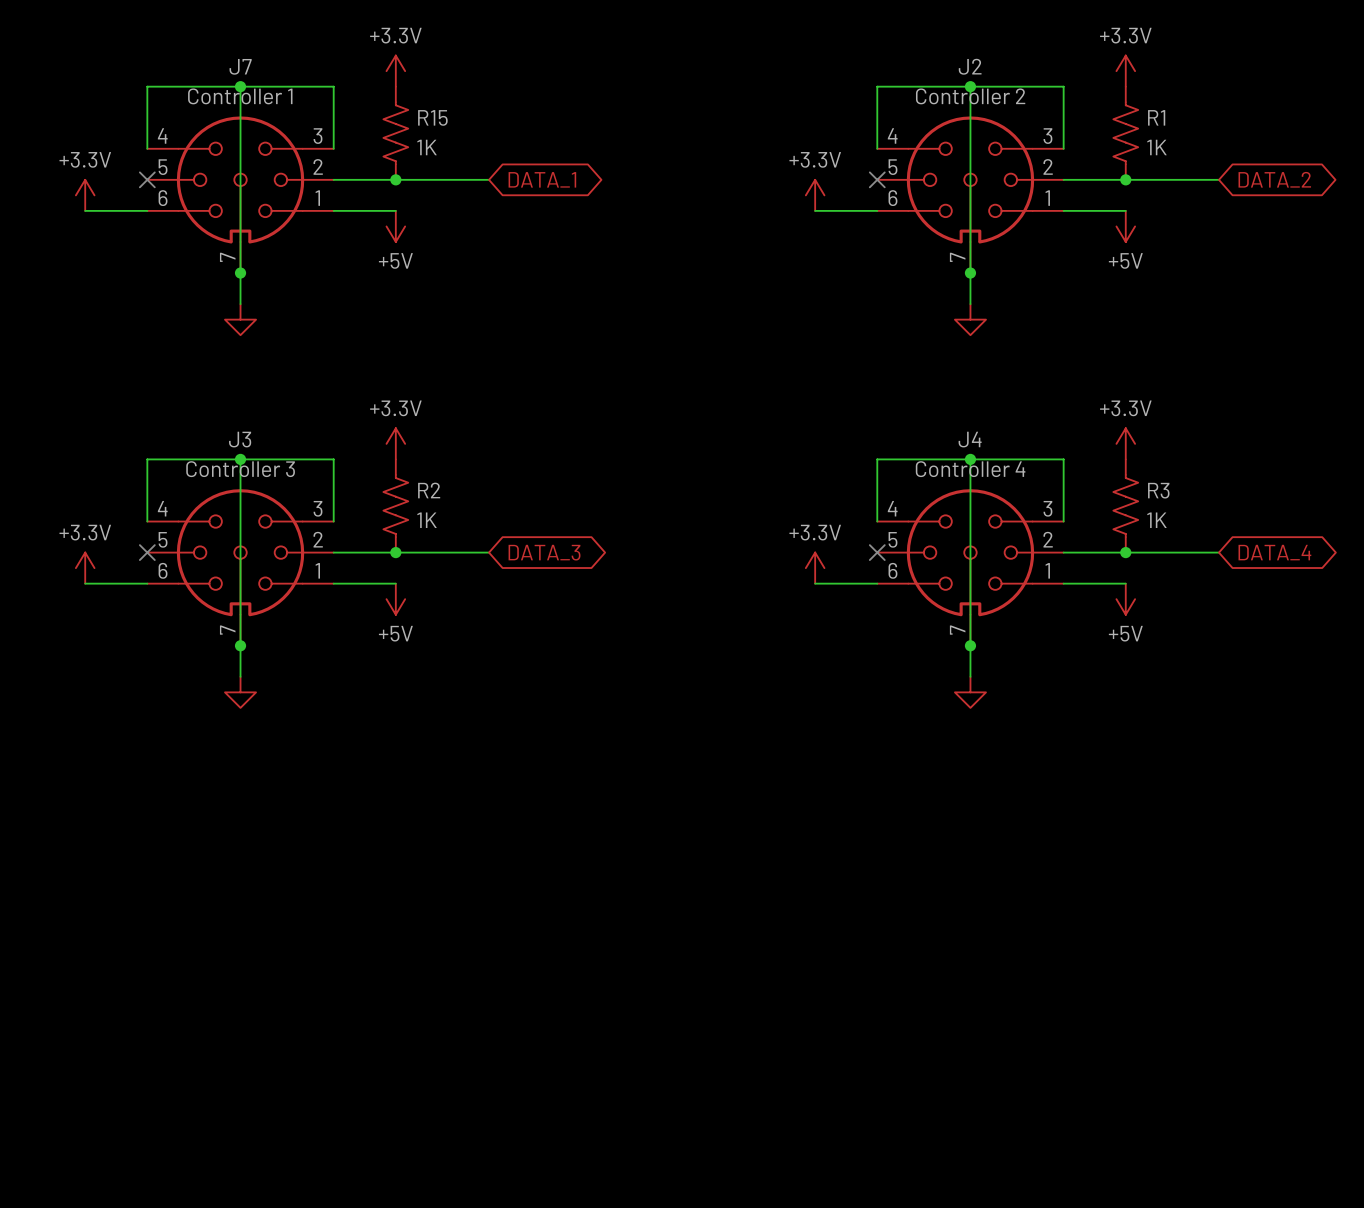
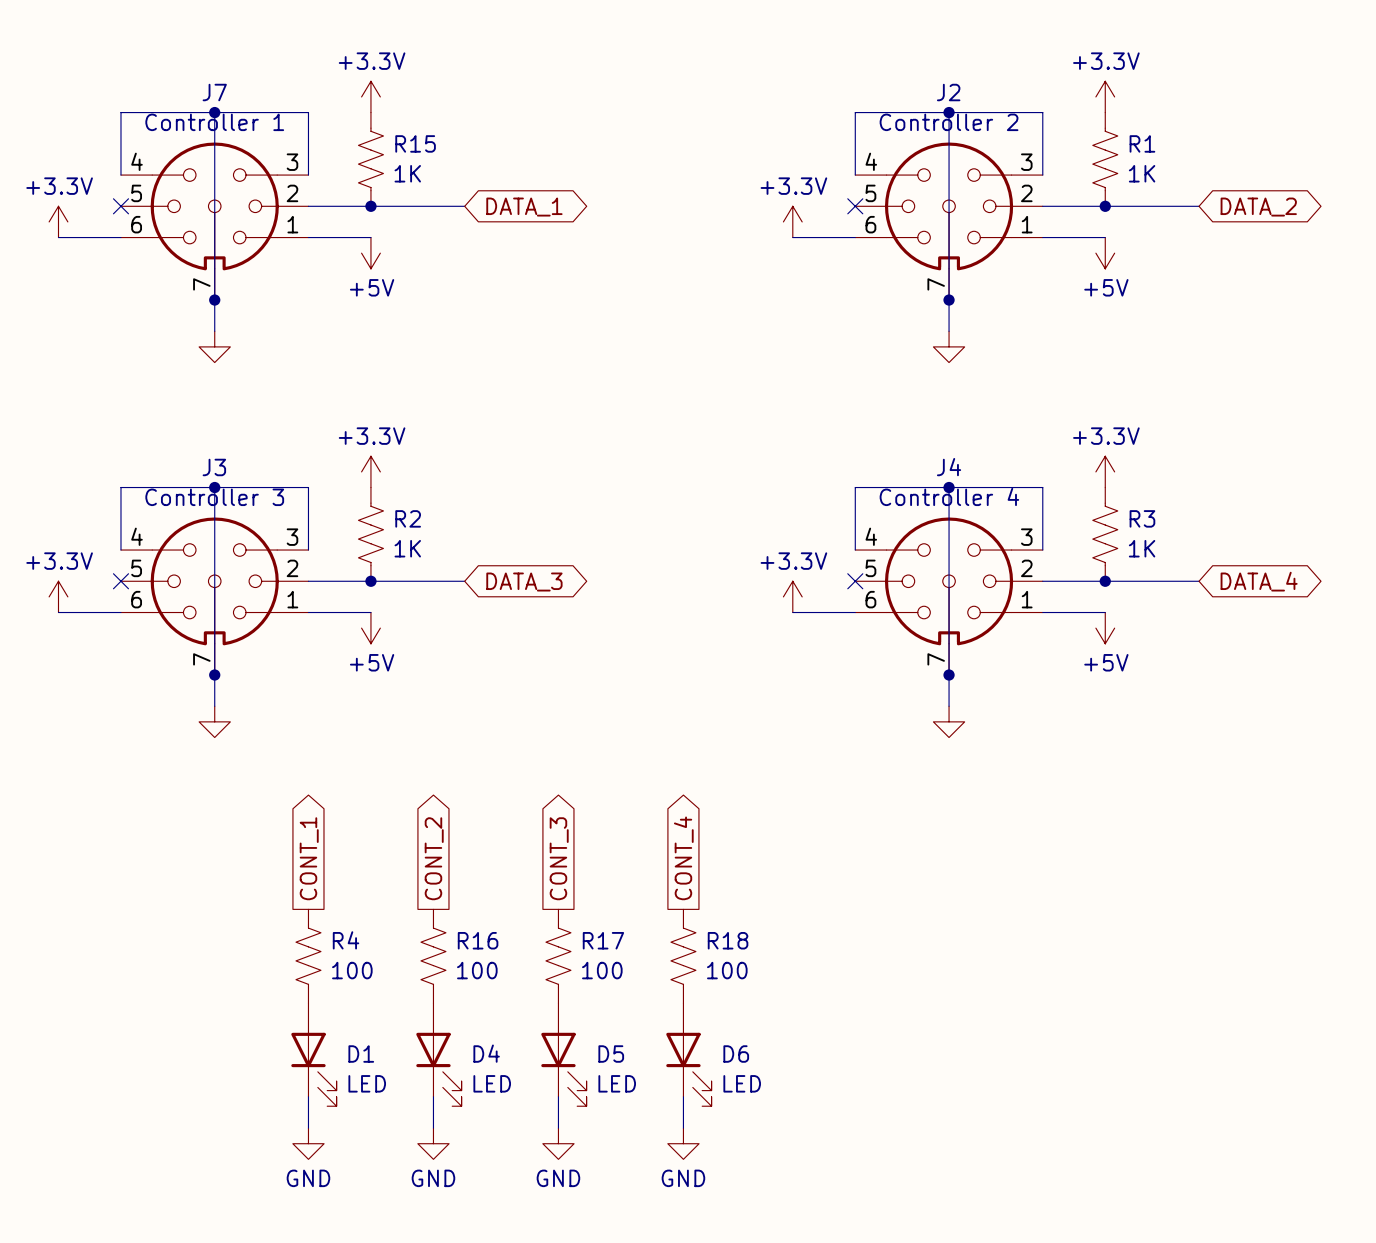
global label: none -> CONT_2 (434, 858)
global label: none -> CONT_4 (683, 858)
global label: none -> CONT_3 (559, 858)
global label: none -> CONT_1 (309, 858)
R4: none -> 100 (308, 956)
R16: none -> 100 (433, 956)
R17: none -> 100 (558, 956)
R18: none -> 100 (683, 956)
D1: none -> LED (313, 1054)
D4: none -> LED (438, 1054)
D5: none -> LED (563, 1054)
D6: none -> LED (688, 1054)
wire: none -> (308, 1096) (308, 1128)
wire: none -> (433, 1096) (433, 1128)
wire: none -> (558, 1096) (558, 1128)
wire: none -> (683, 1096) (683, 1128)
power symbol: none -> GND (308, 1143)
power symbol: none -> GND (433, 1143)
power symbol: none -> GND (558, 1143)
power symbol: none -> GND (683, 1143)

